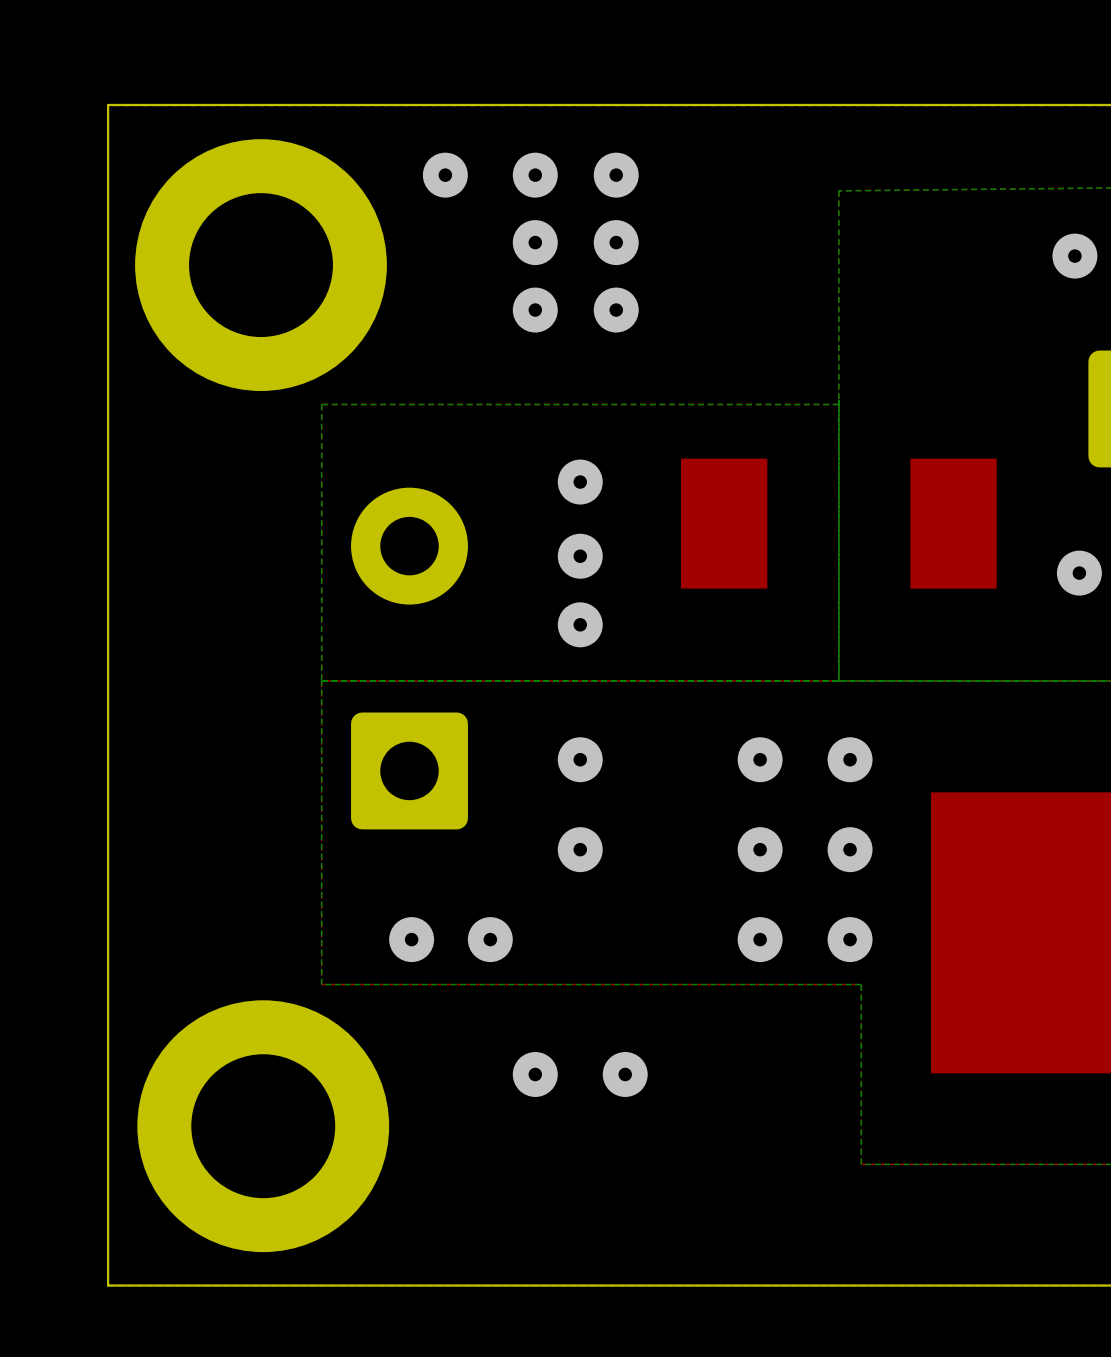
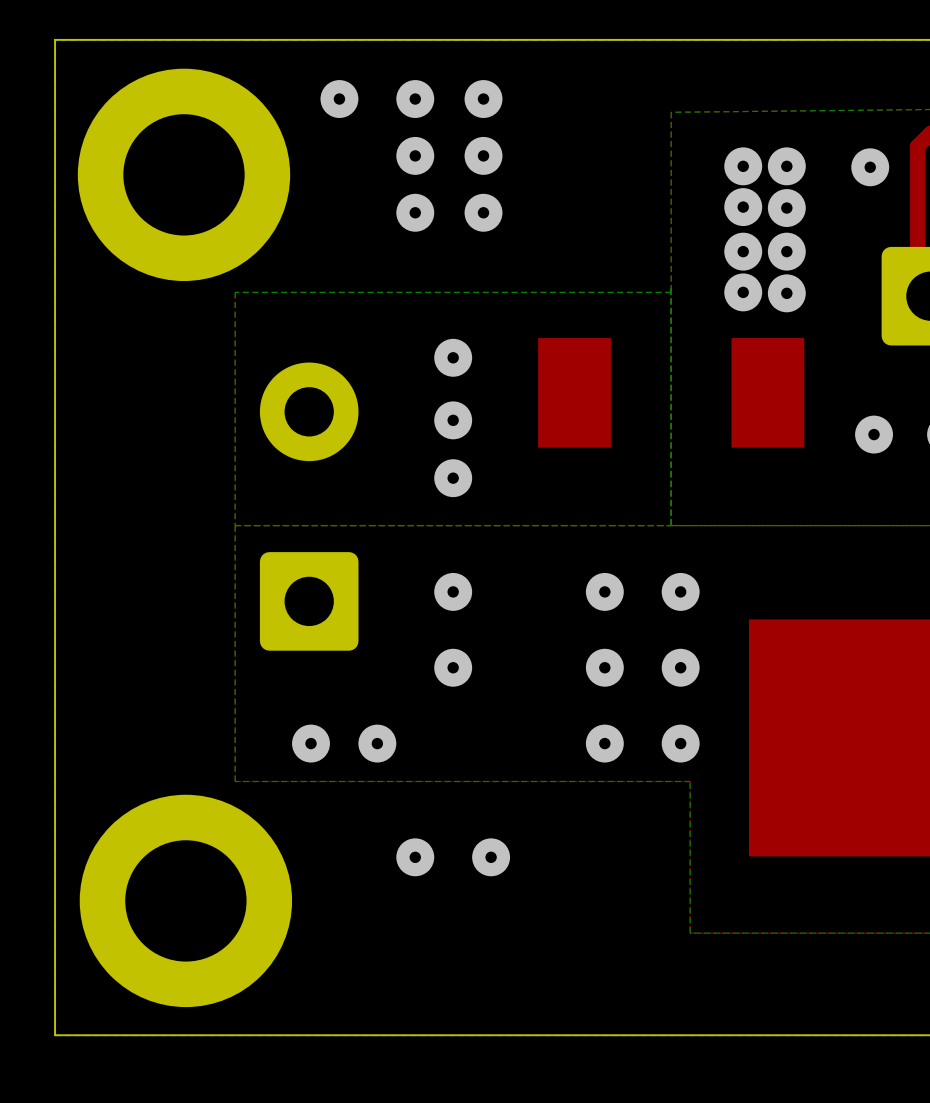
via: none -> (743, 166)
via: none -> (786, 166)
via: none -> (743, 207)
via: none -> (786, 208)
via: none -> (743, 251)
via: none -> (786, 251)
via: none -> (743, 292)
via: none -> (786, 293)

